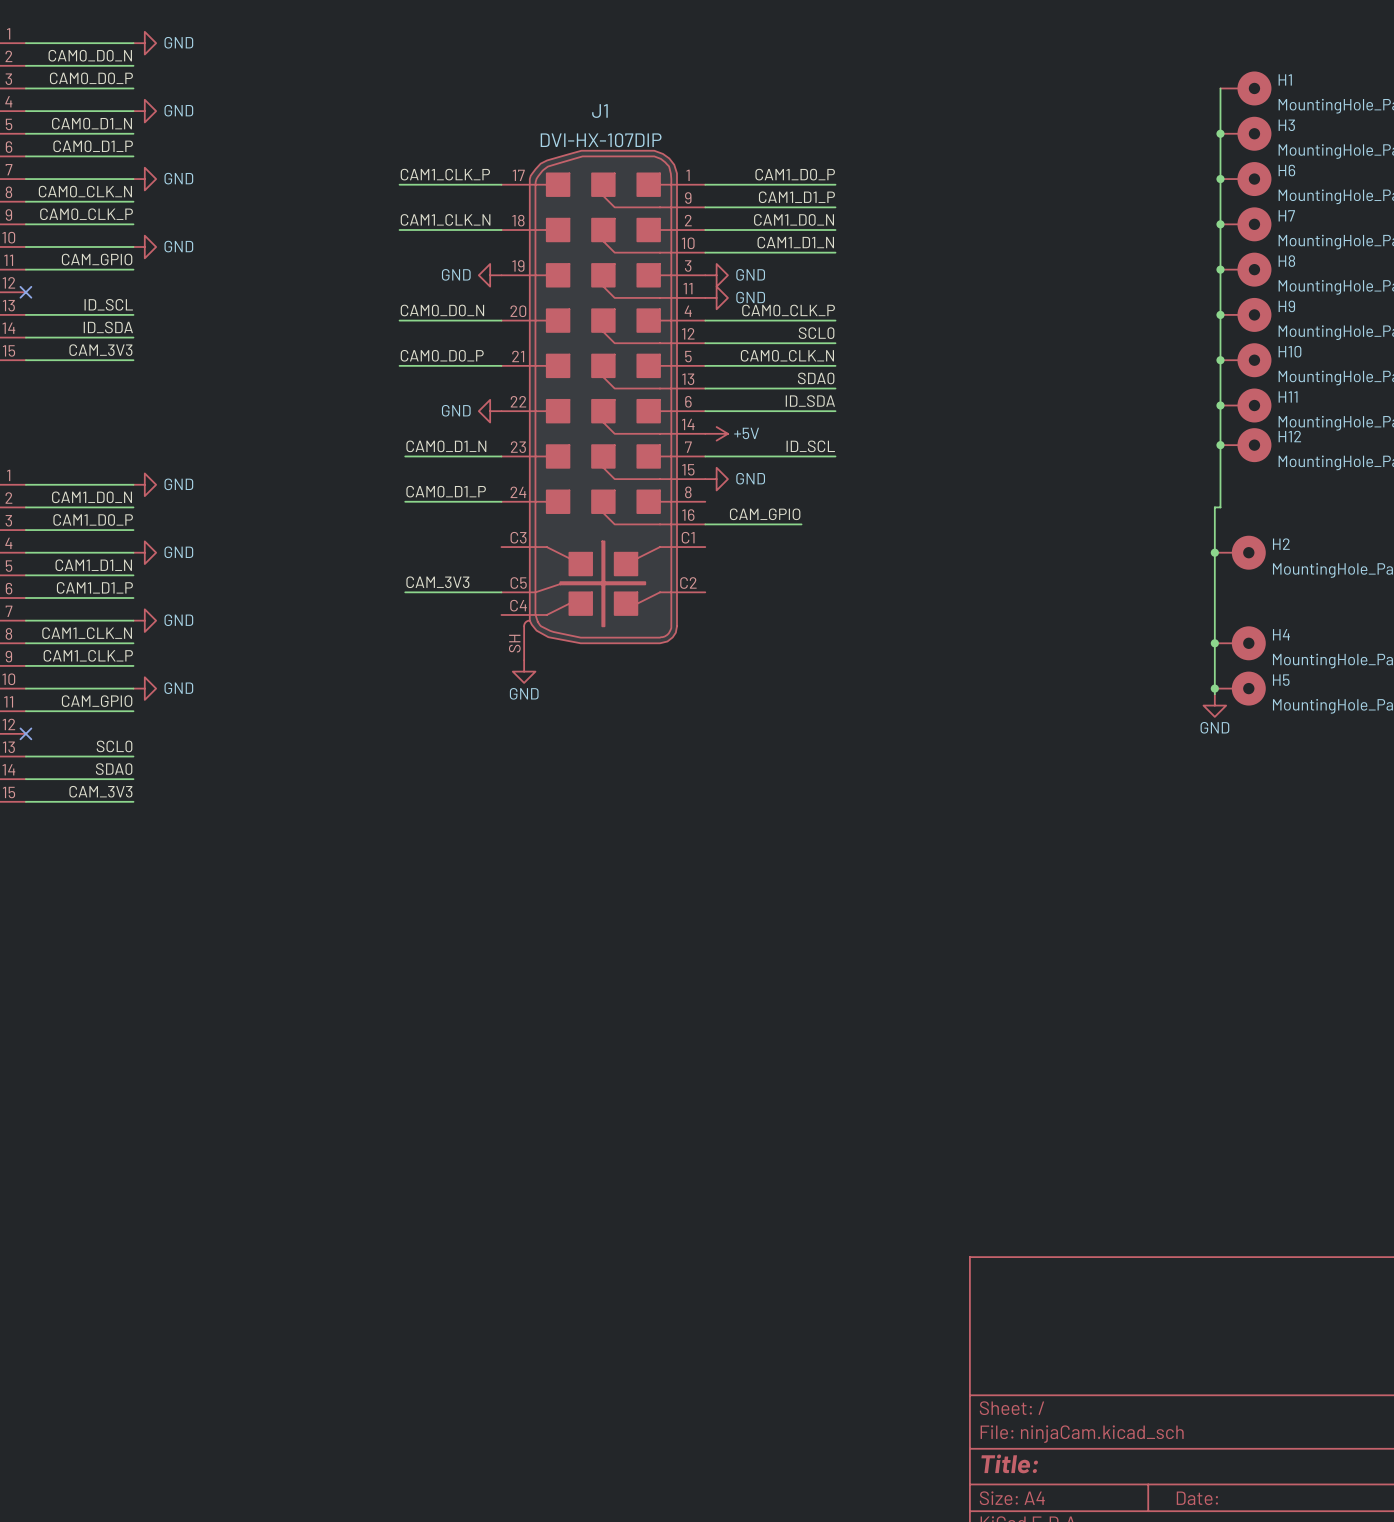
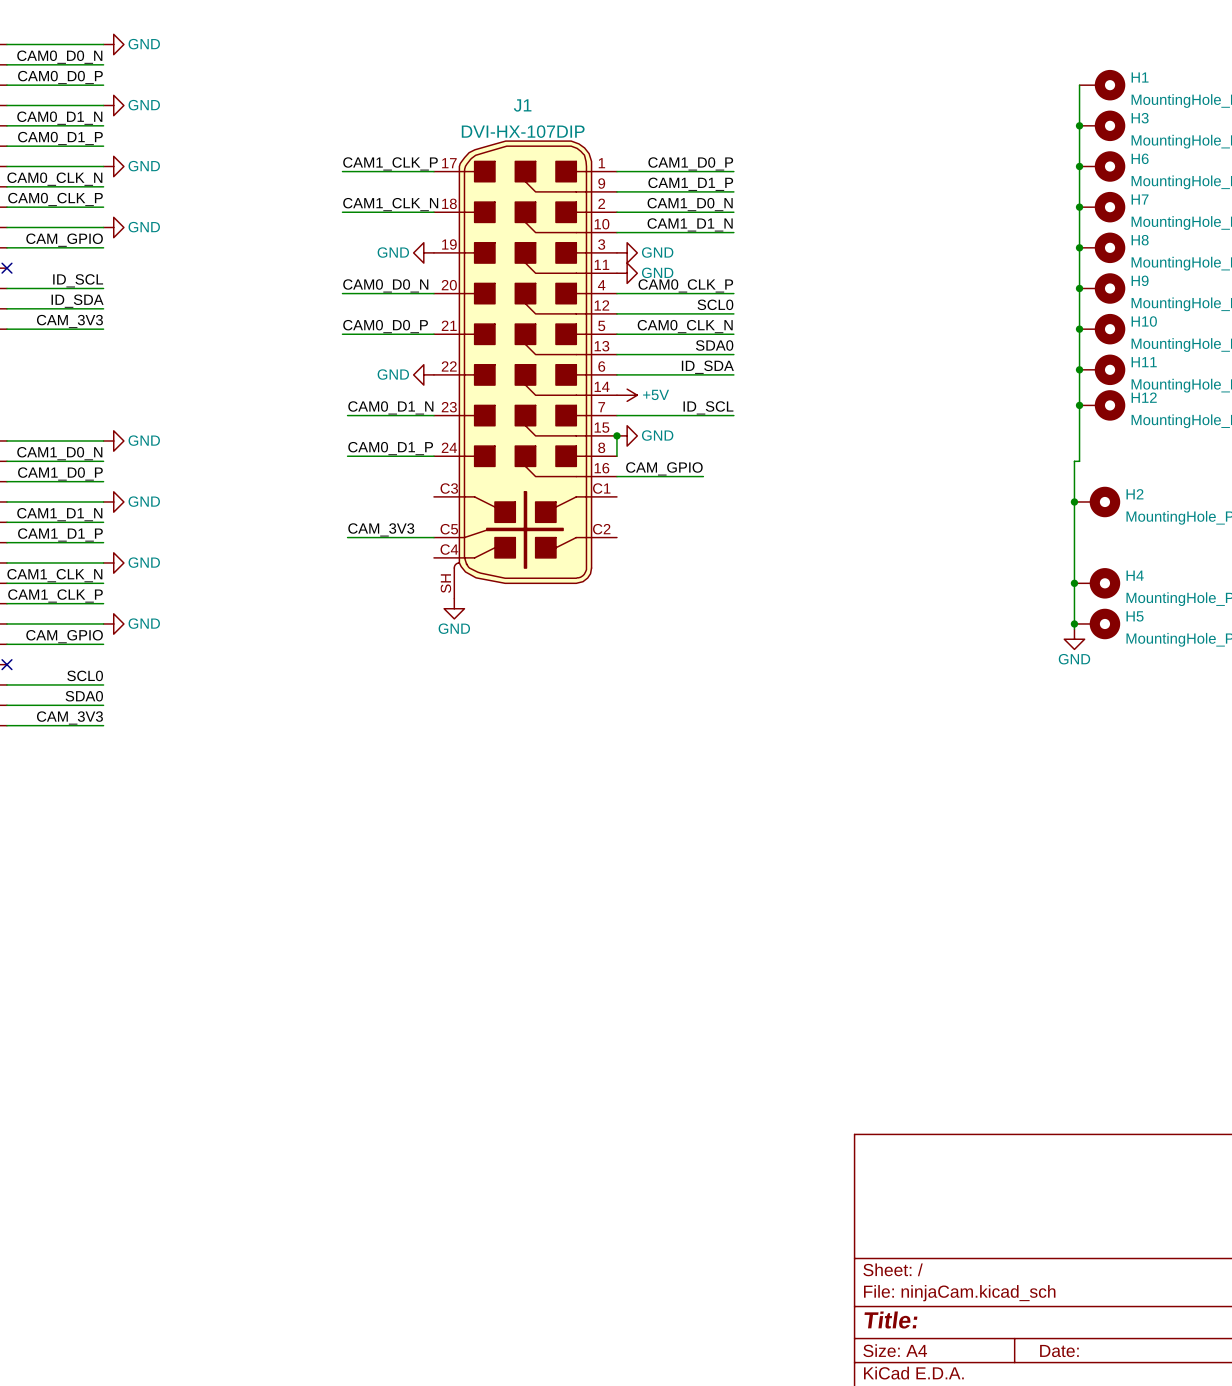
wire: none -> (616, 435) (616, 456)
junction: none -> (616, 435)

